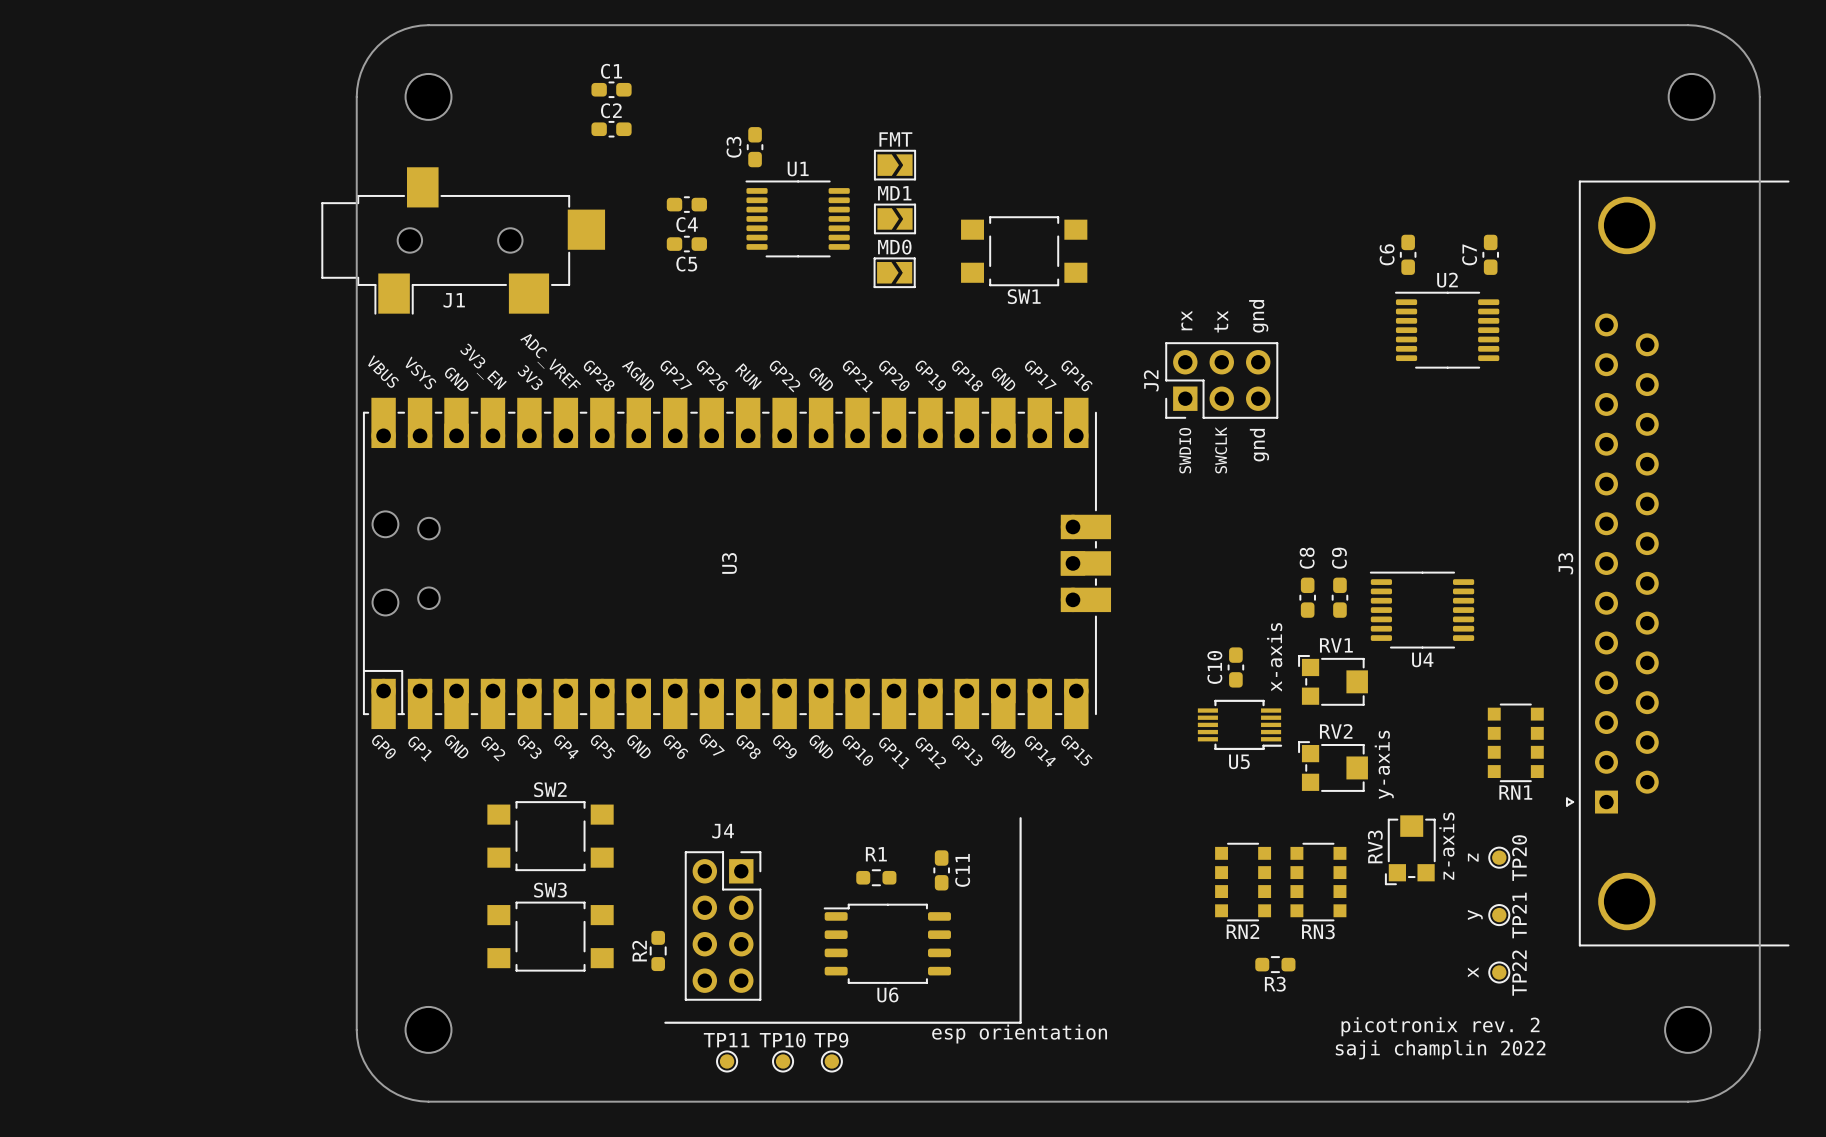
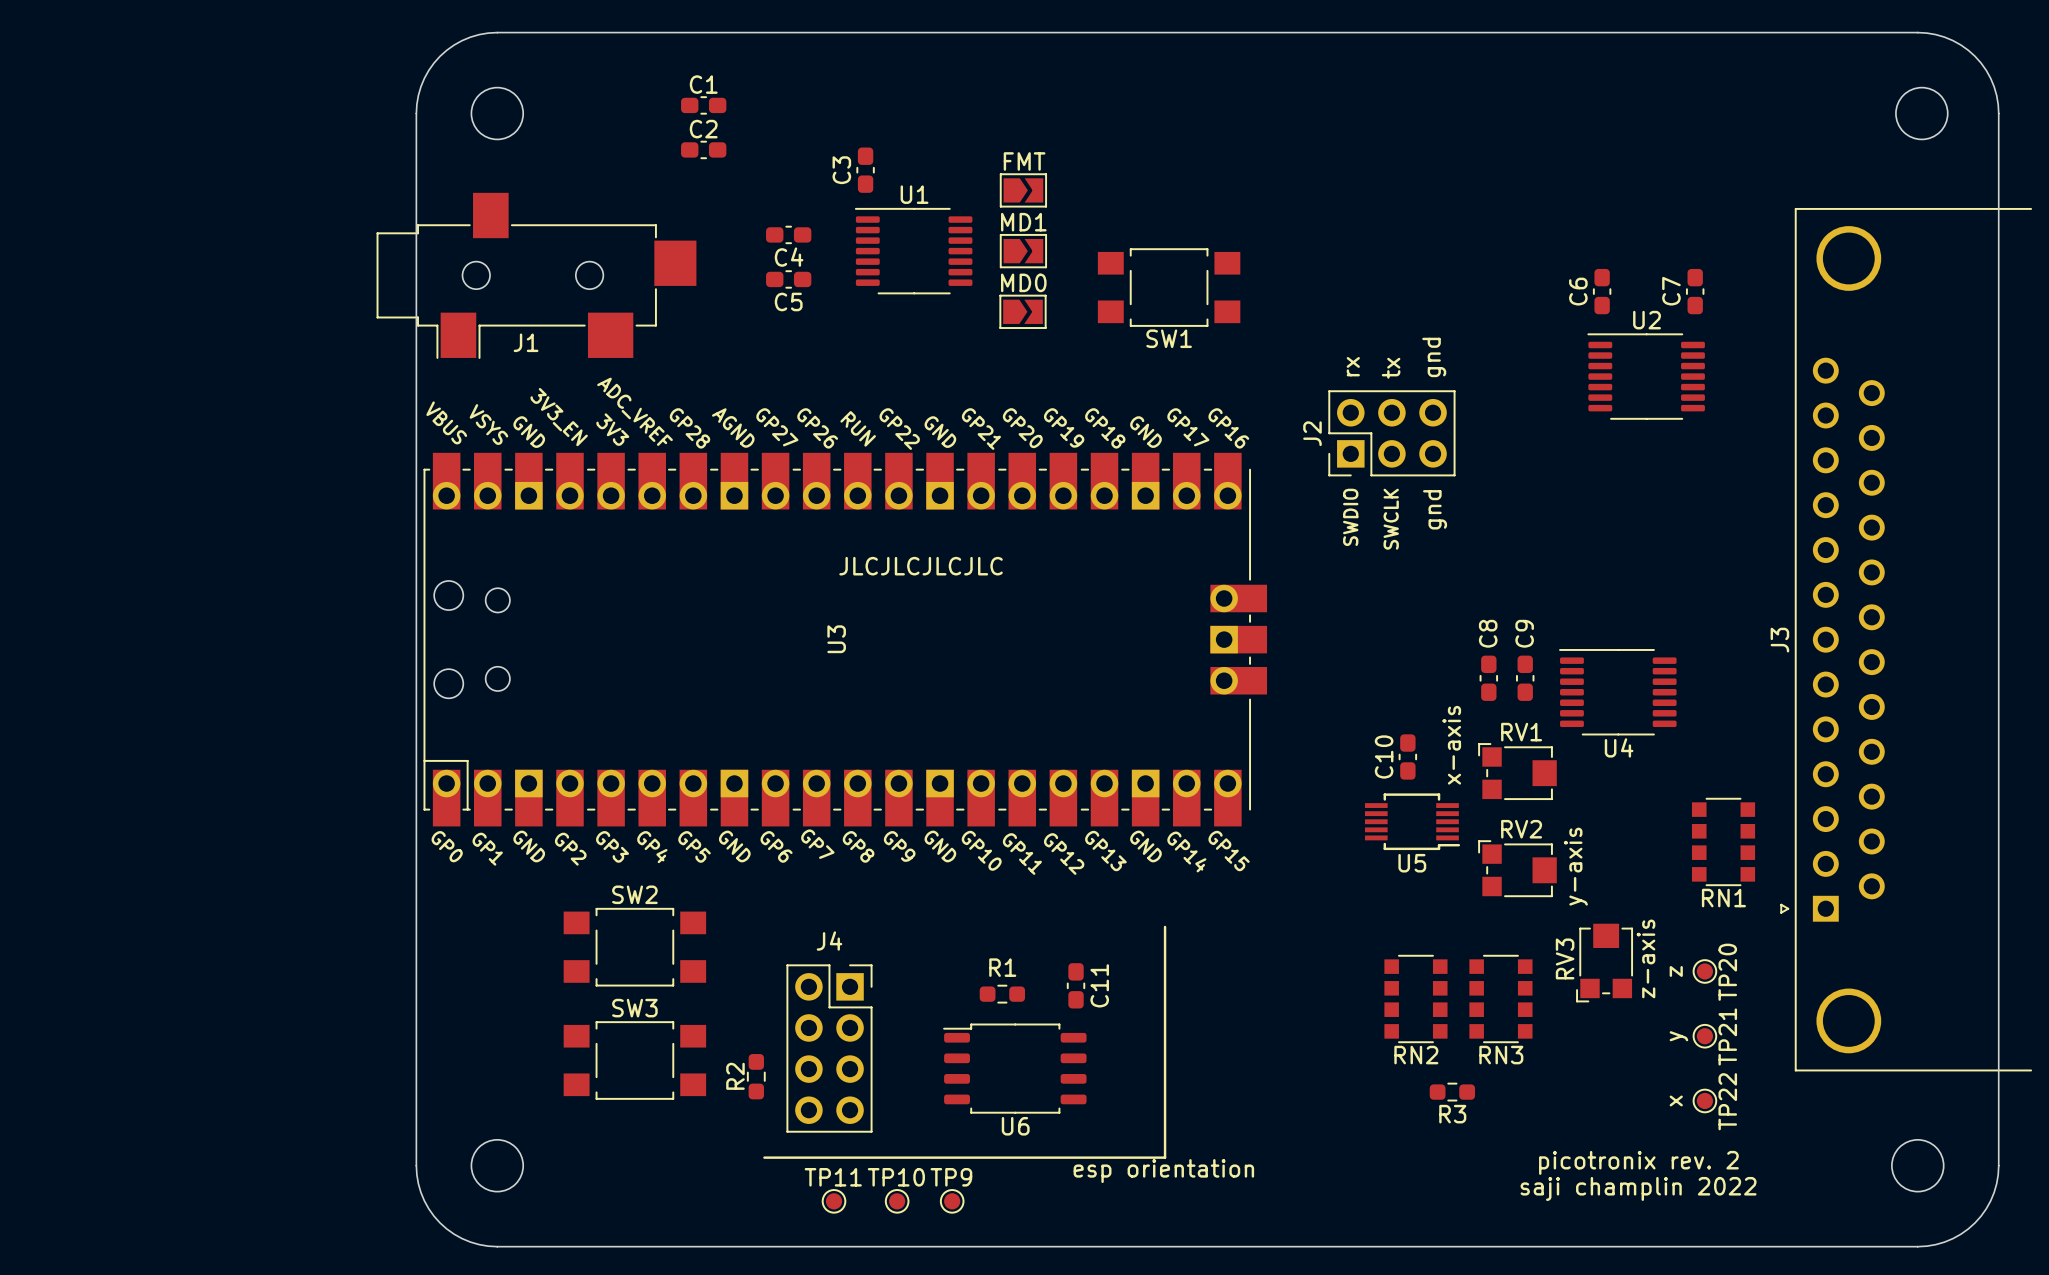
text: none -> JLCJLCJLCJLC (921, 566)

